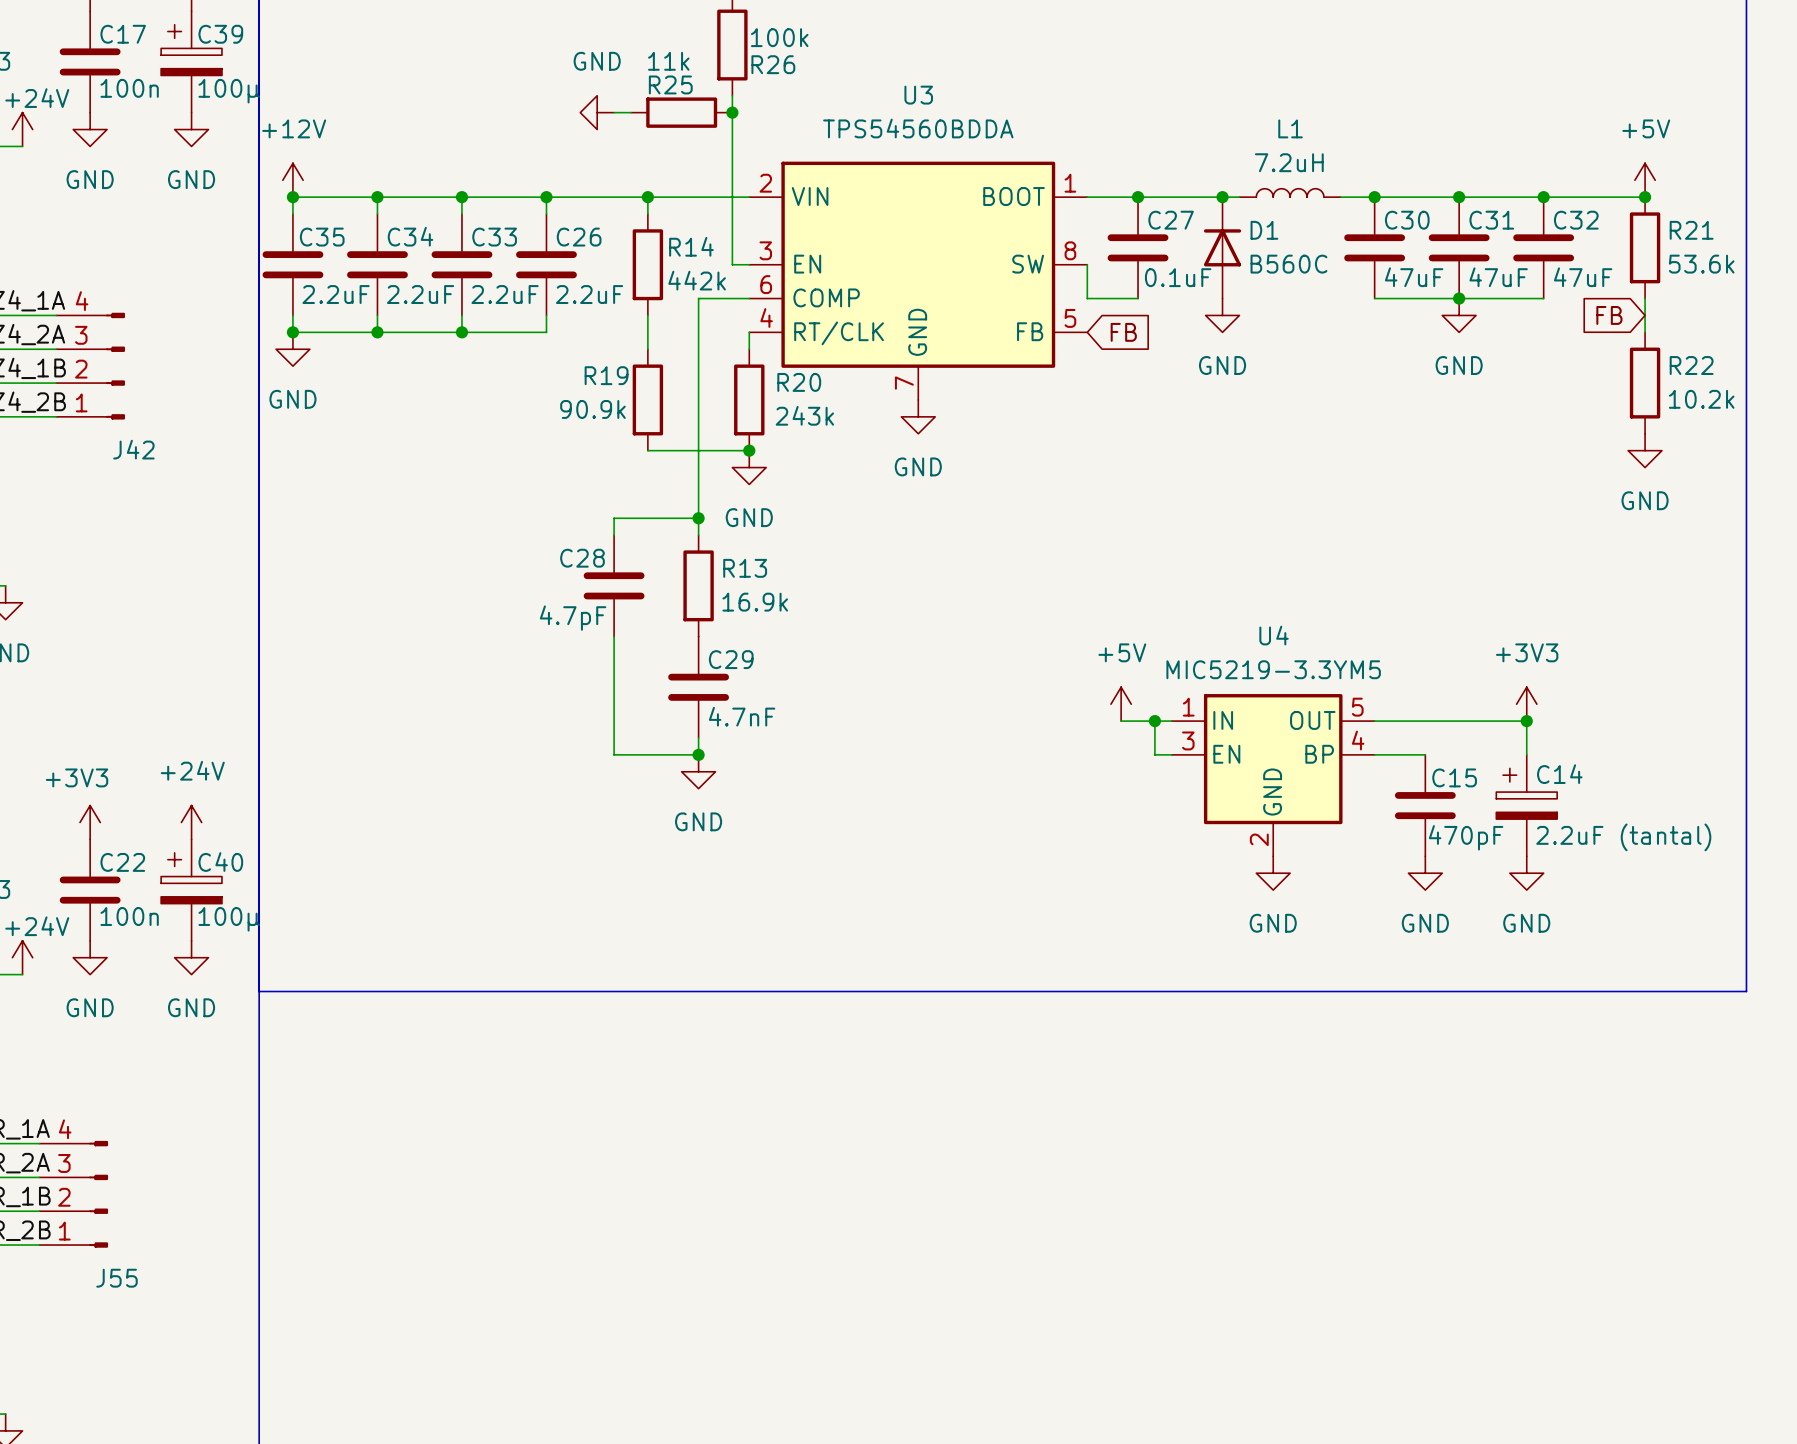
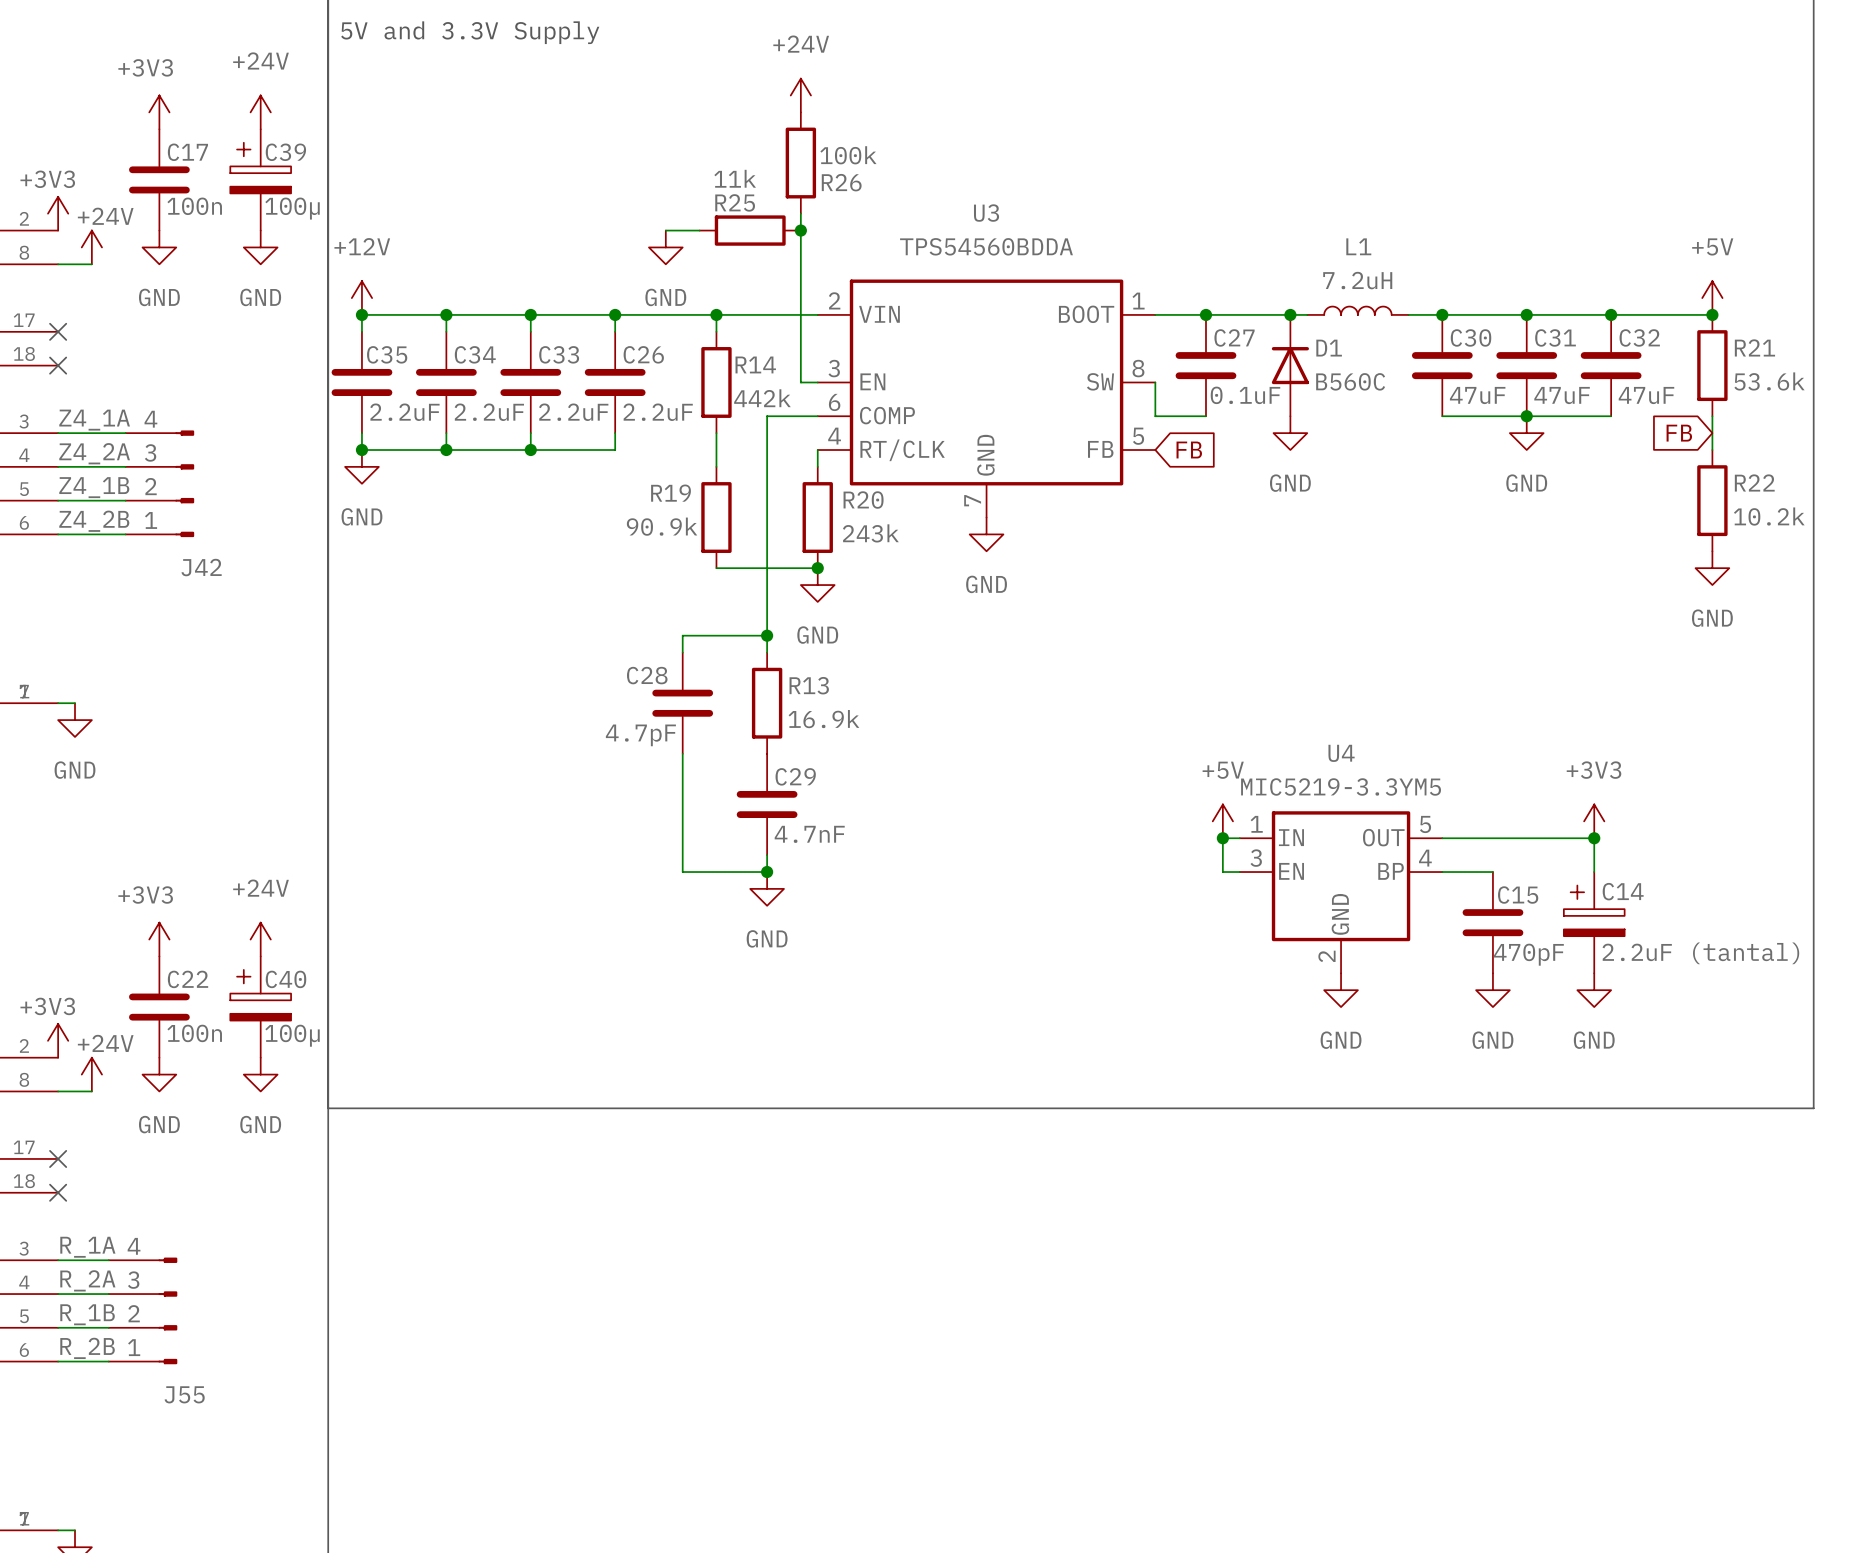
power symbol text position: GND (597, 61) -> GND (665, 297)
power symbol rotation: 0° (597, 112) -> 90° counterclockwise (665, 247)
power symbol position: +5V (1121, 704) -> +5V (1222, 821)
wire: (1121, 721) (1154, 721) -> none

